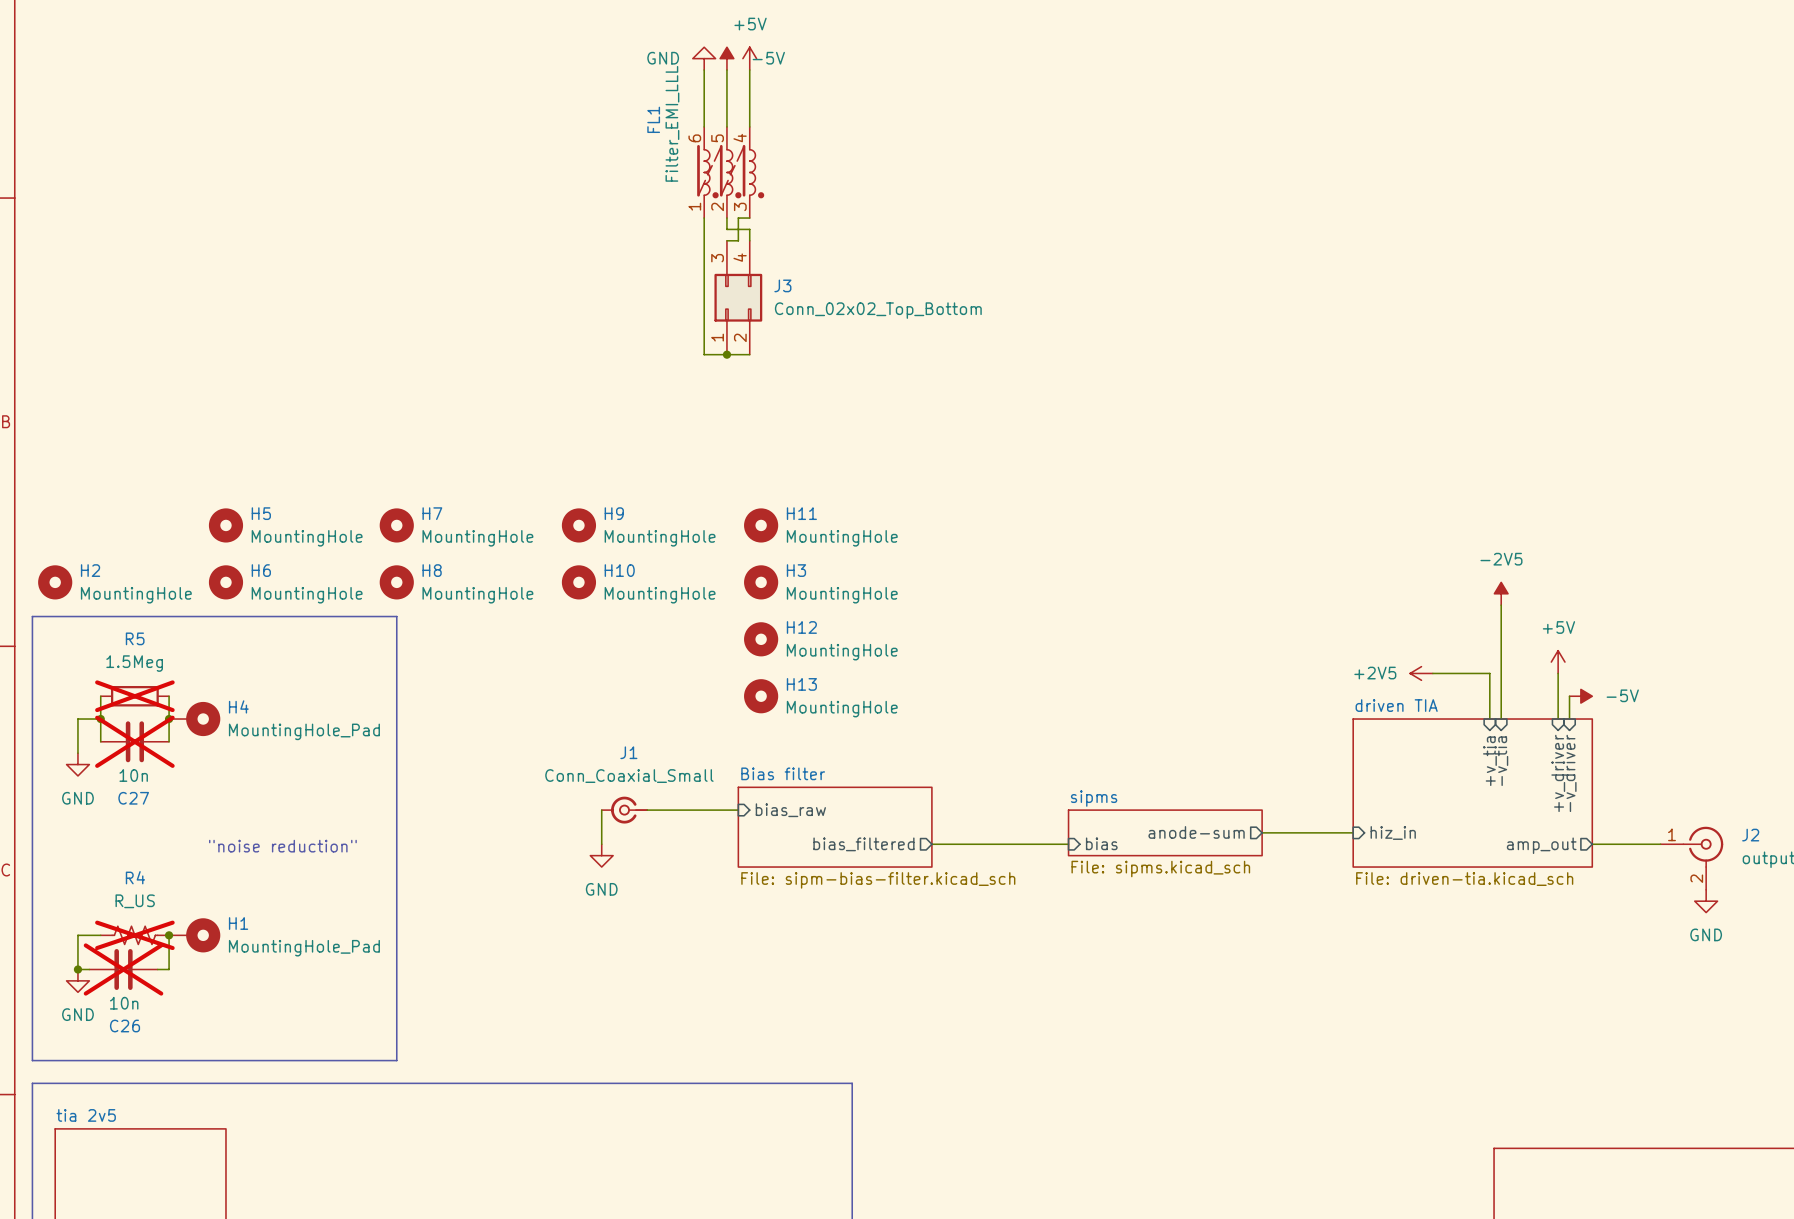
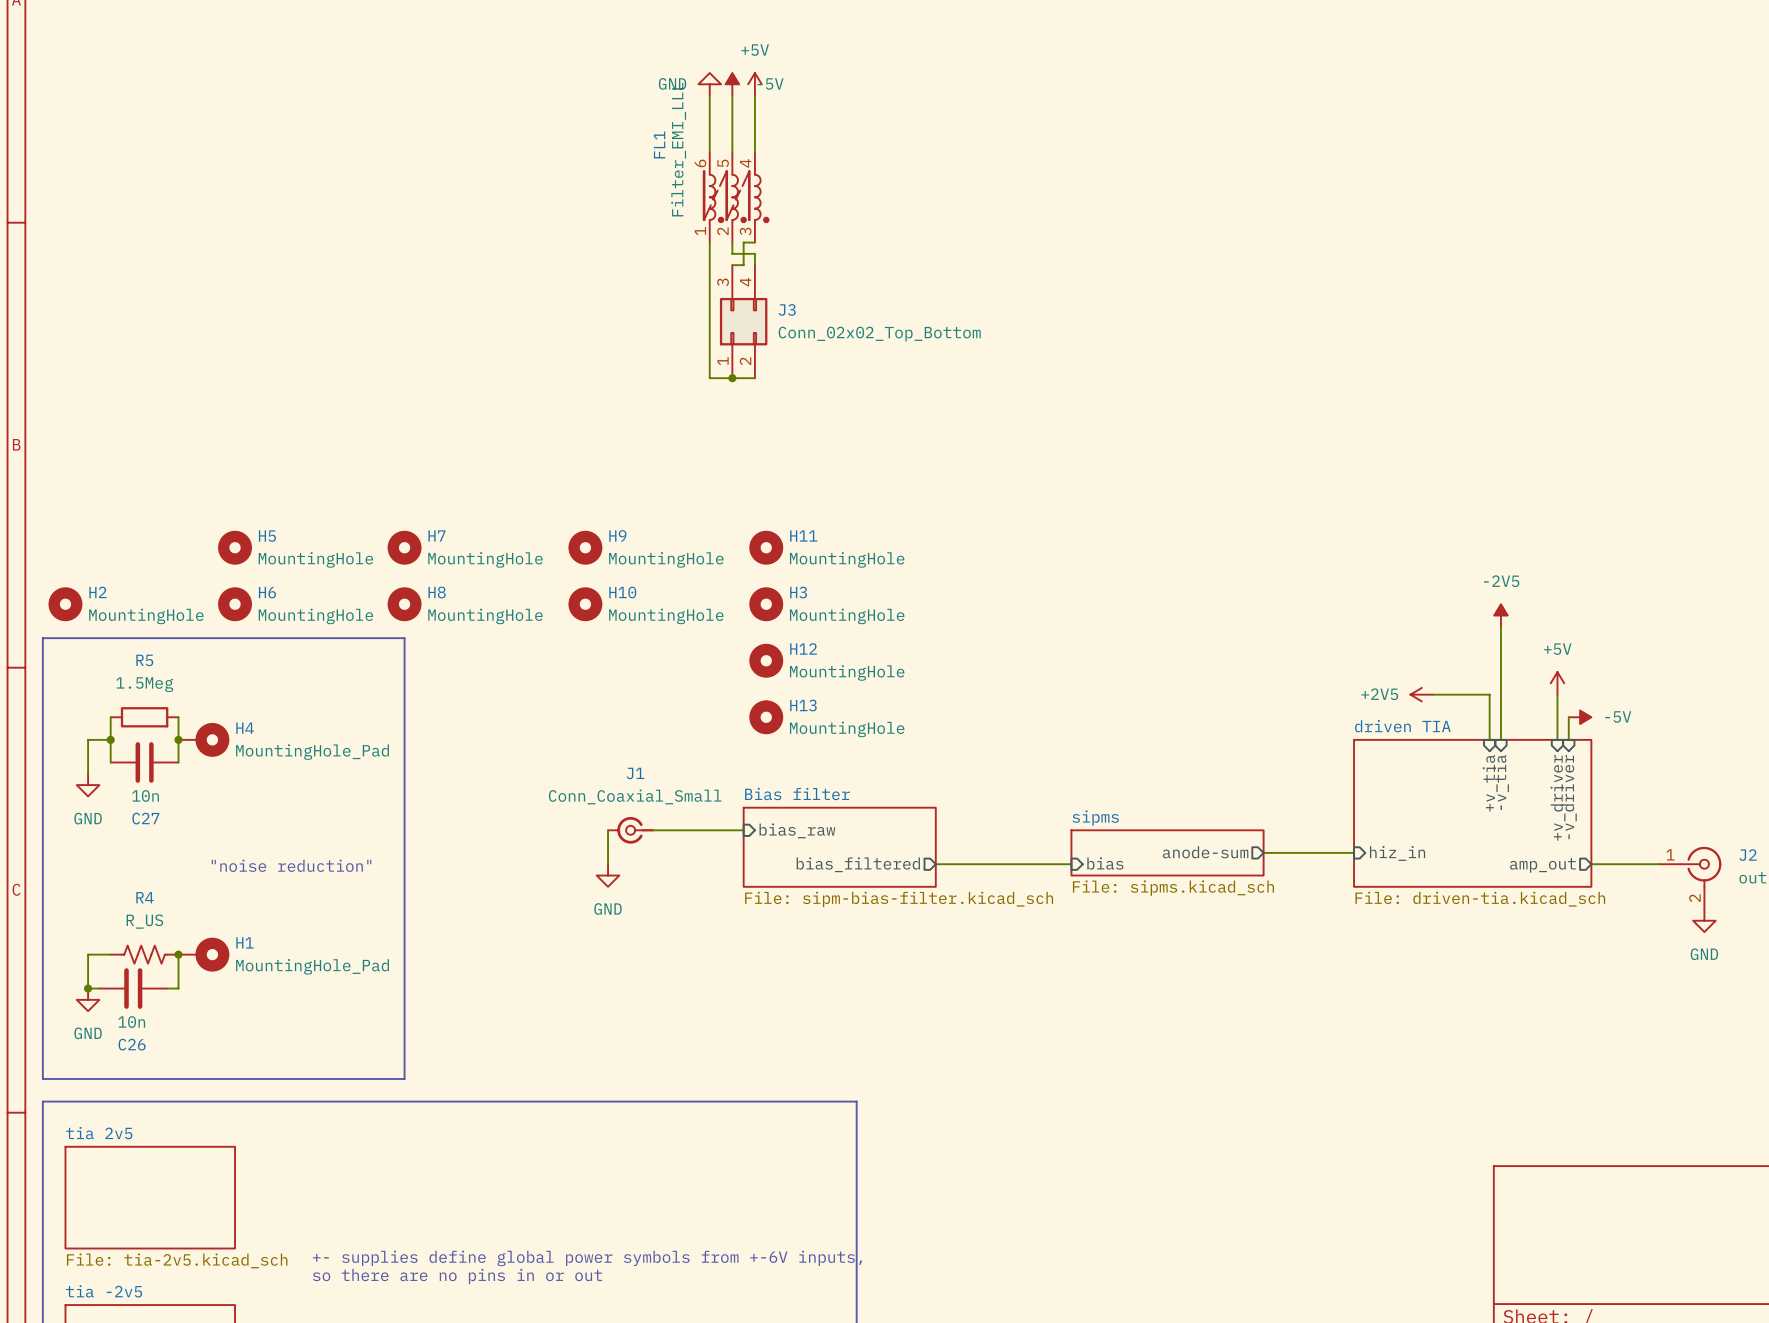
R5 do-not-place cross: (134, 696) -> none
C27 do-not-place cross: (134, 741) -> none
R4 do-not-place cross: (134, 935) -> none
C26 do-not-place cross: (123, 969) -> none

